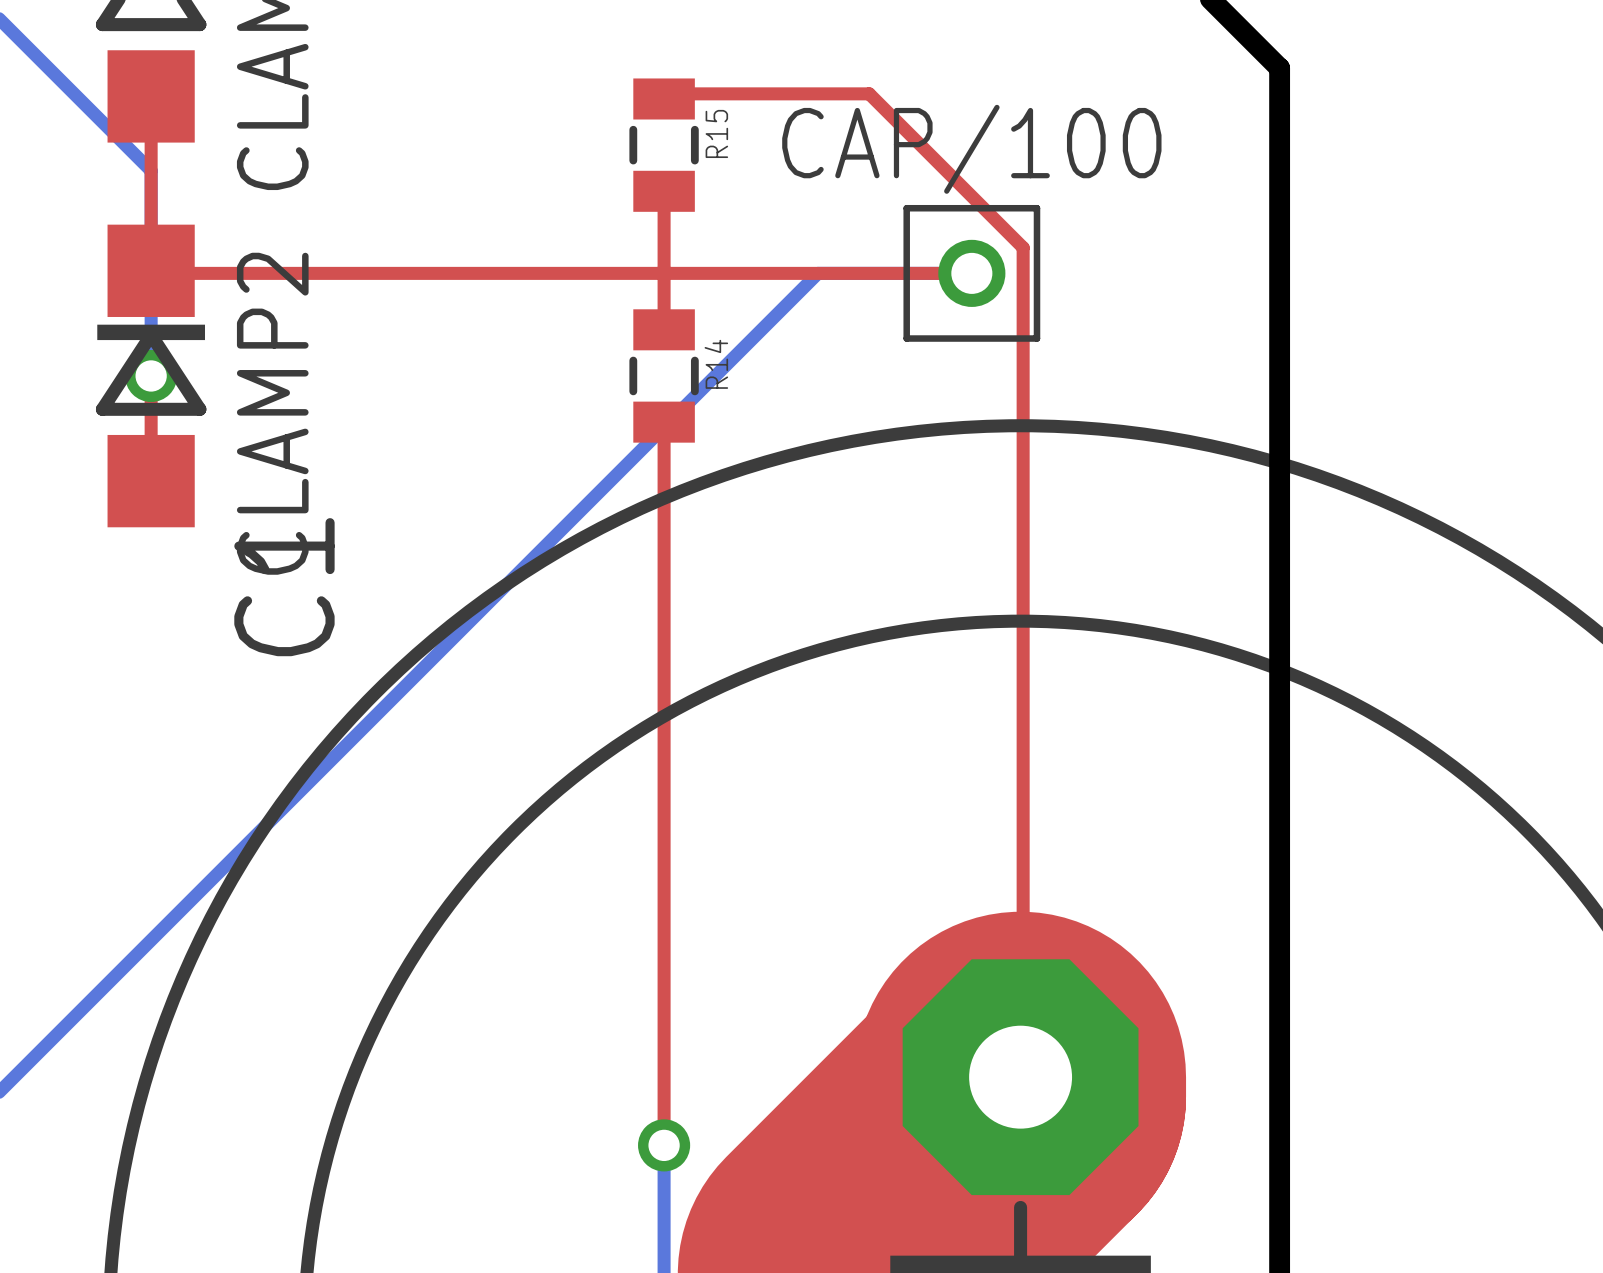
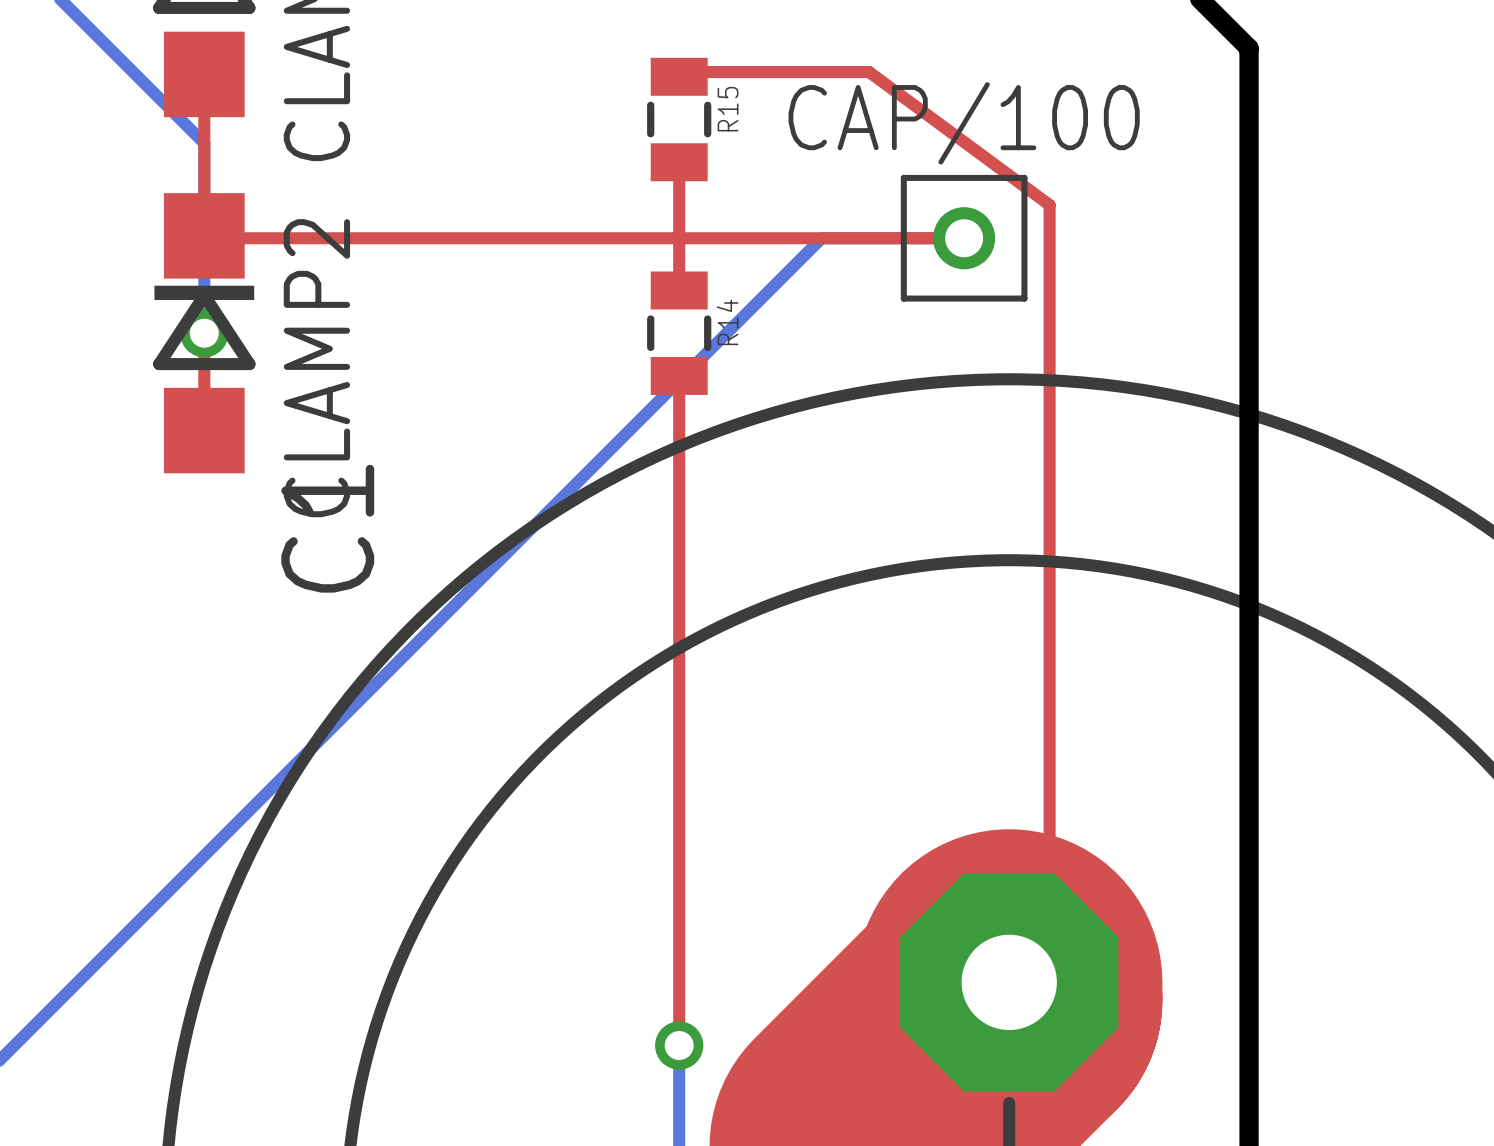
top track: (869, 93) (1023, 247) (1023, 914) (1020, 1077) -> (869, 72) (1049, 205) (1049, 850) (1009, 982)

